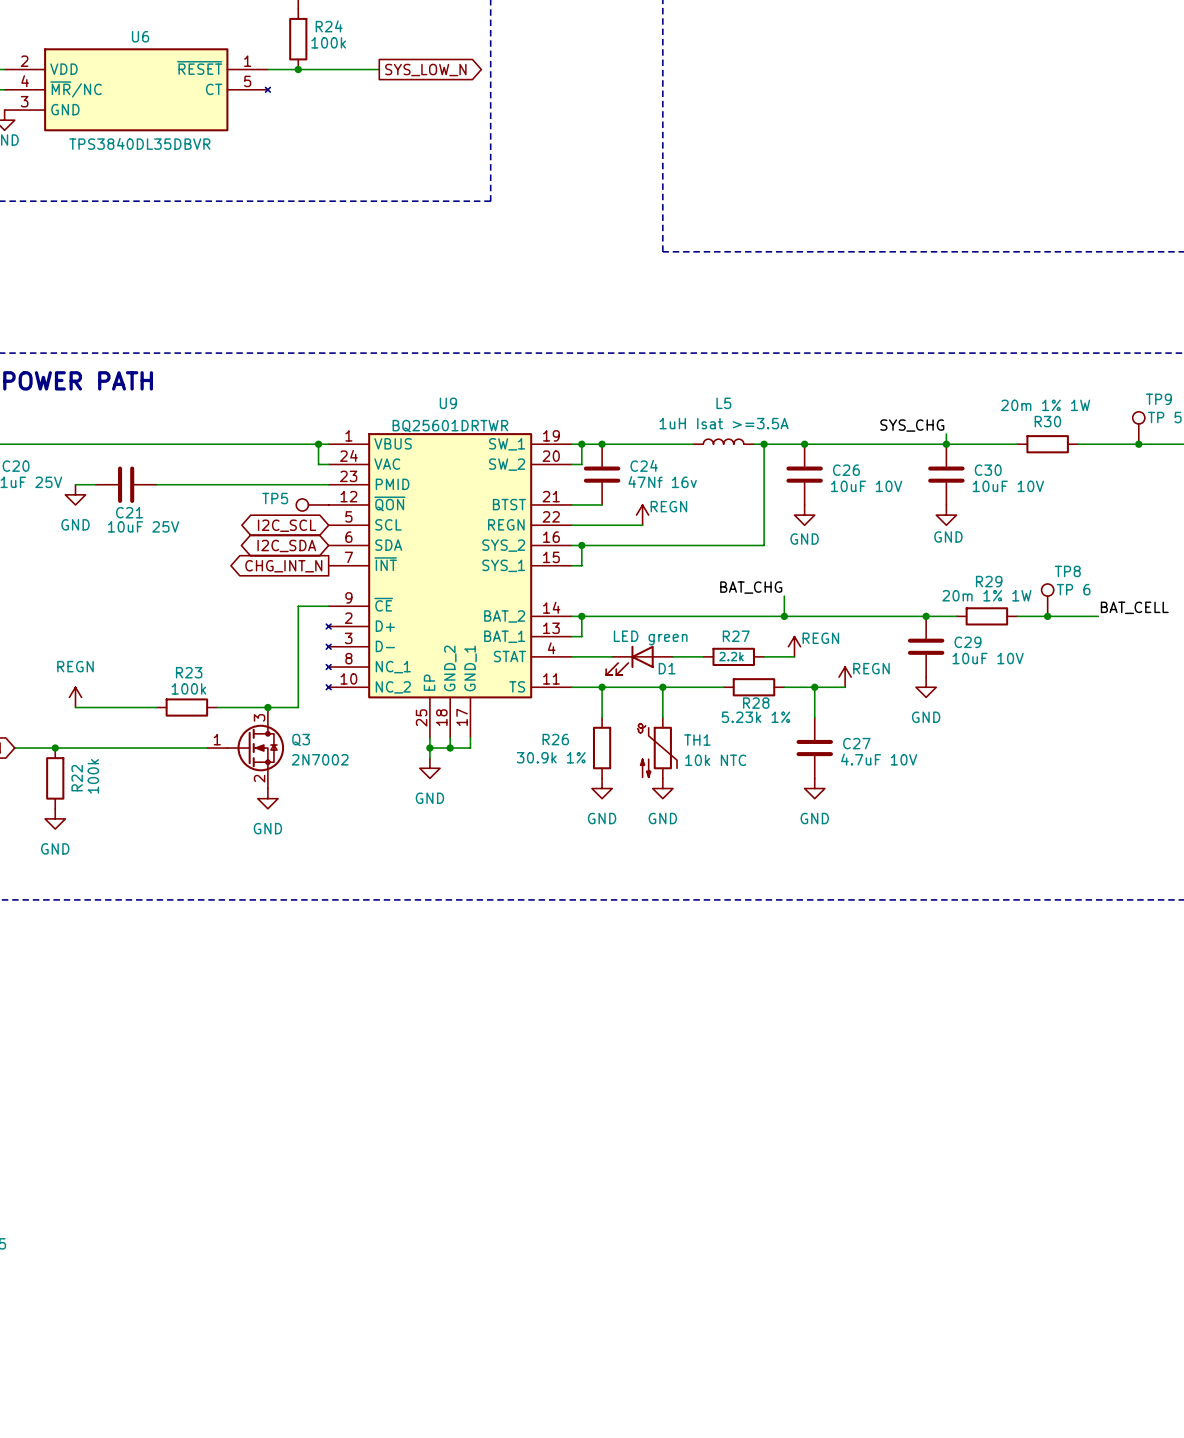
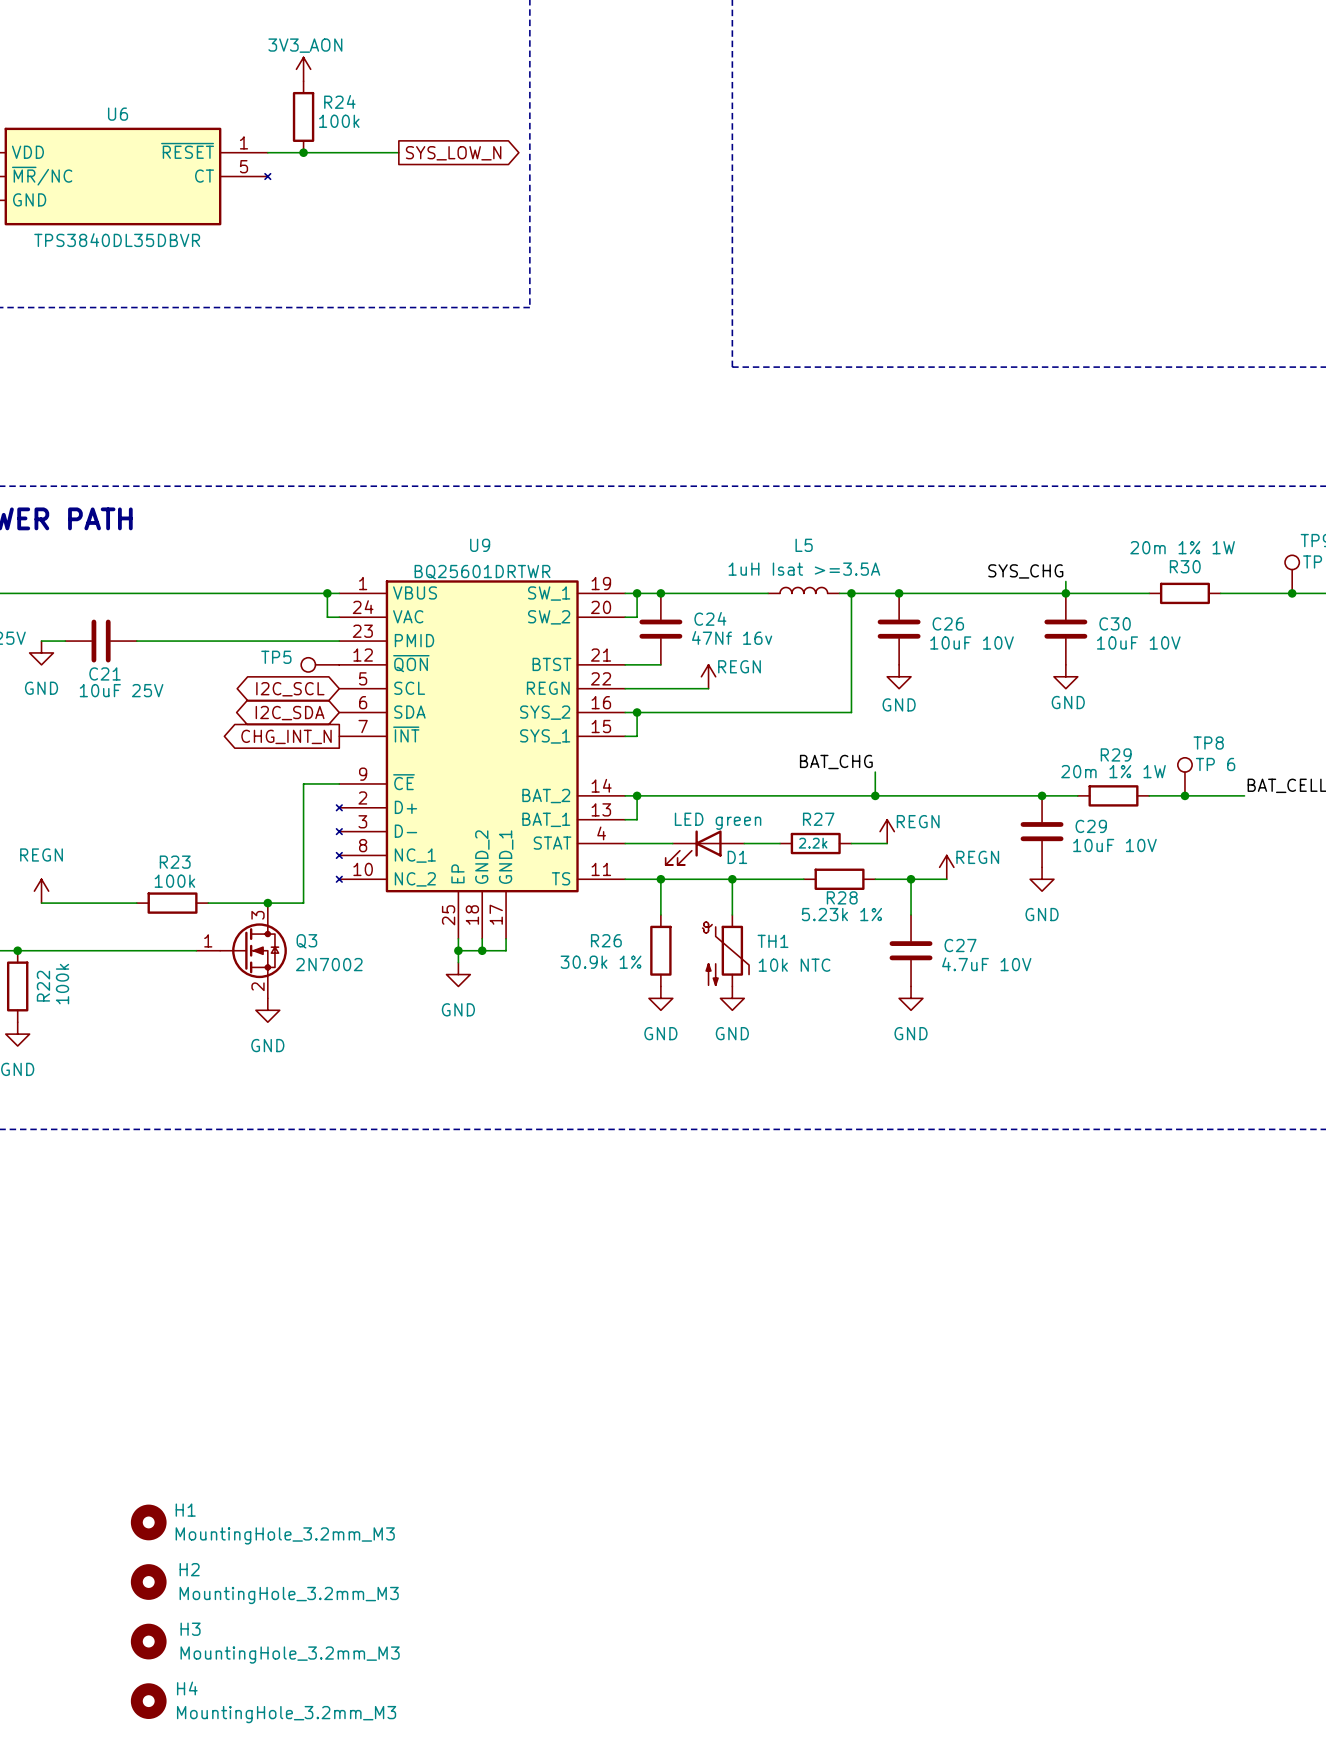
H1: none -> MountingHole_3.2mm_M3 (148, 1522)
H2: none -> MountingHole_3.2mm_M3 (148, 1582)
H3: none -> MountingHole_3.2mm_M3 (148, 1641)
H4: none -> MountingHole_3.2mm_M3 (148, 1701)

